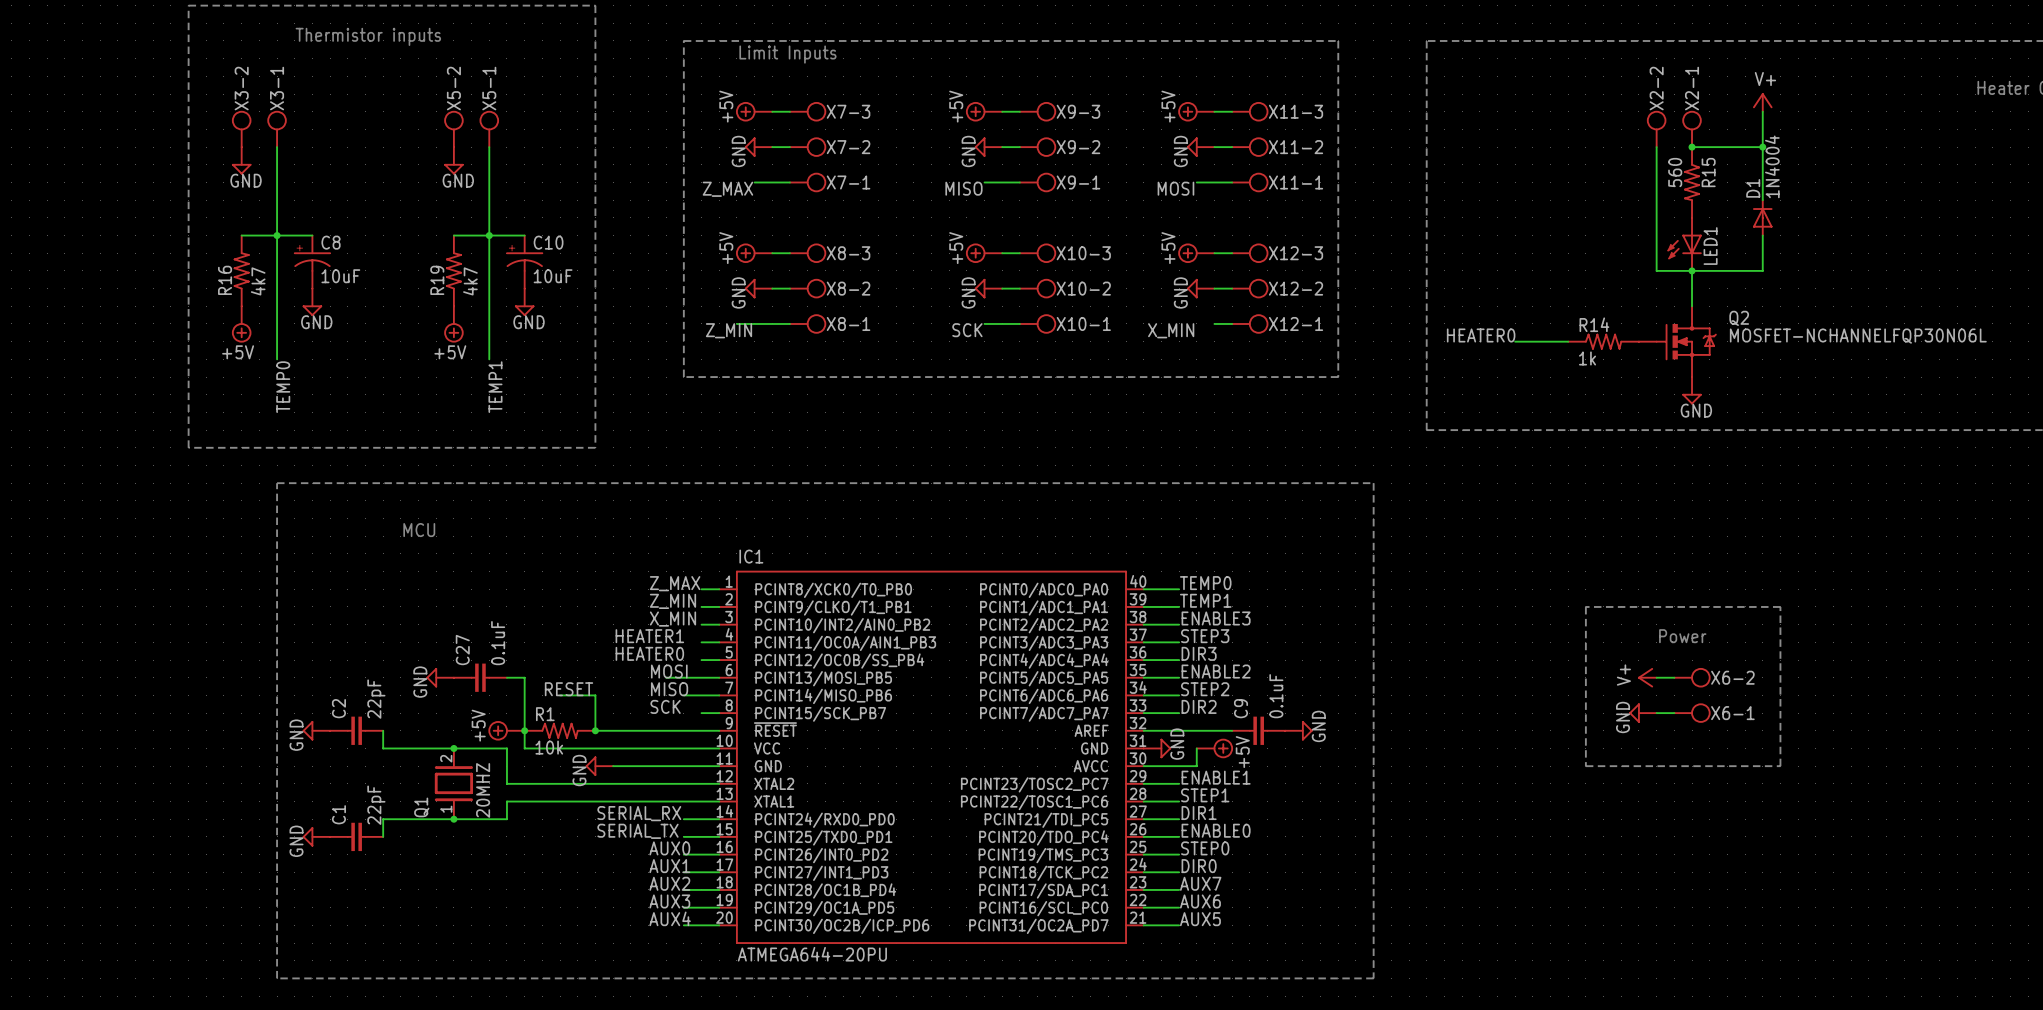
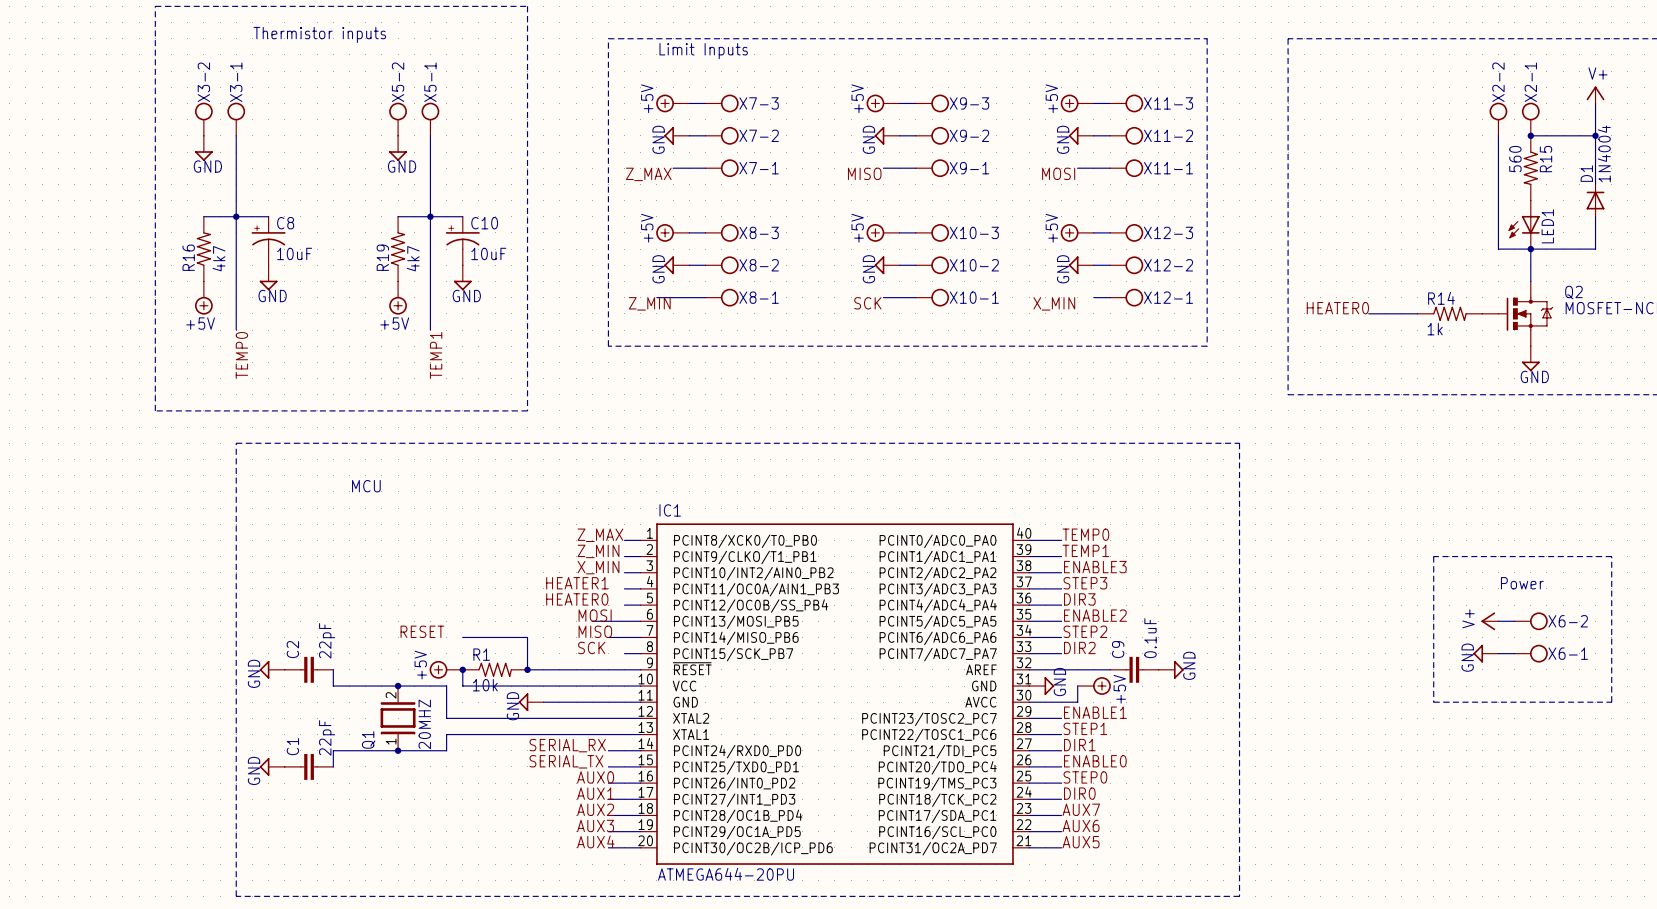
power symbol: GND (440, 677) -> none
C27: 0.1uF (480, 677) -> none
wire: (506, 677) (524, 677) (524, 730) -> none
label position: RESET (569, 689) -> RESET (422, 631)
wire: none -> (462, 637) (495, 637)

